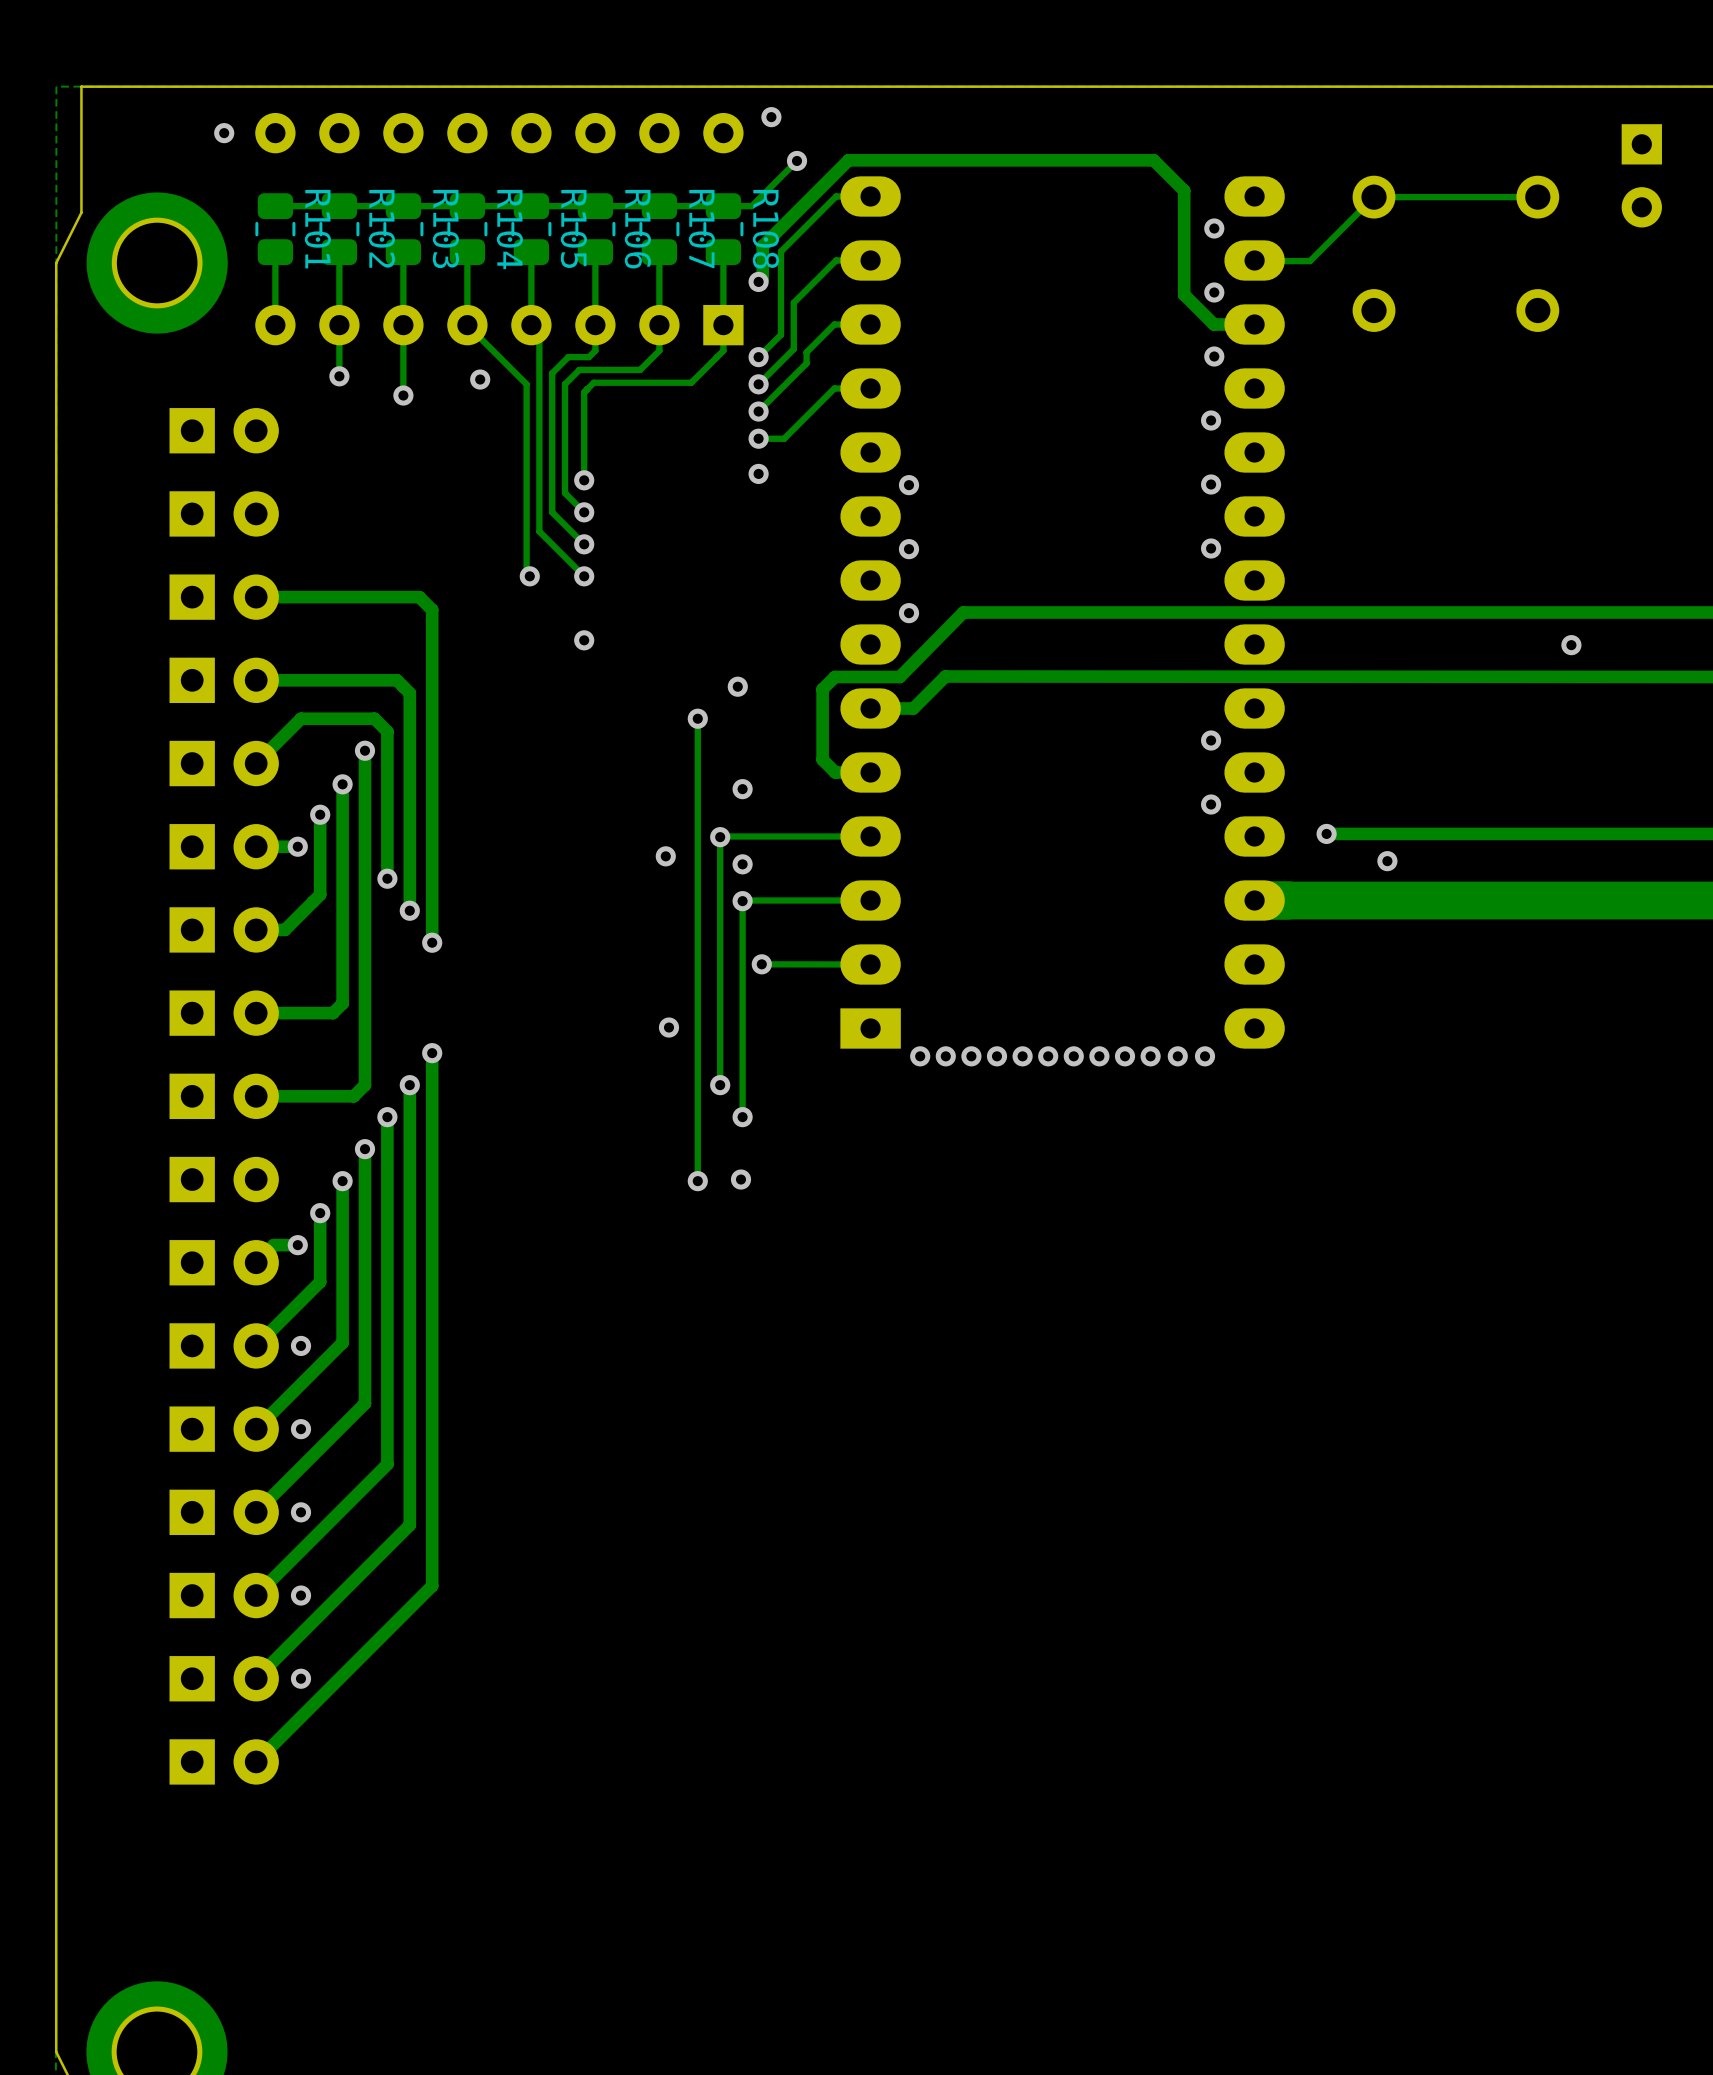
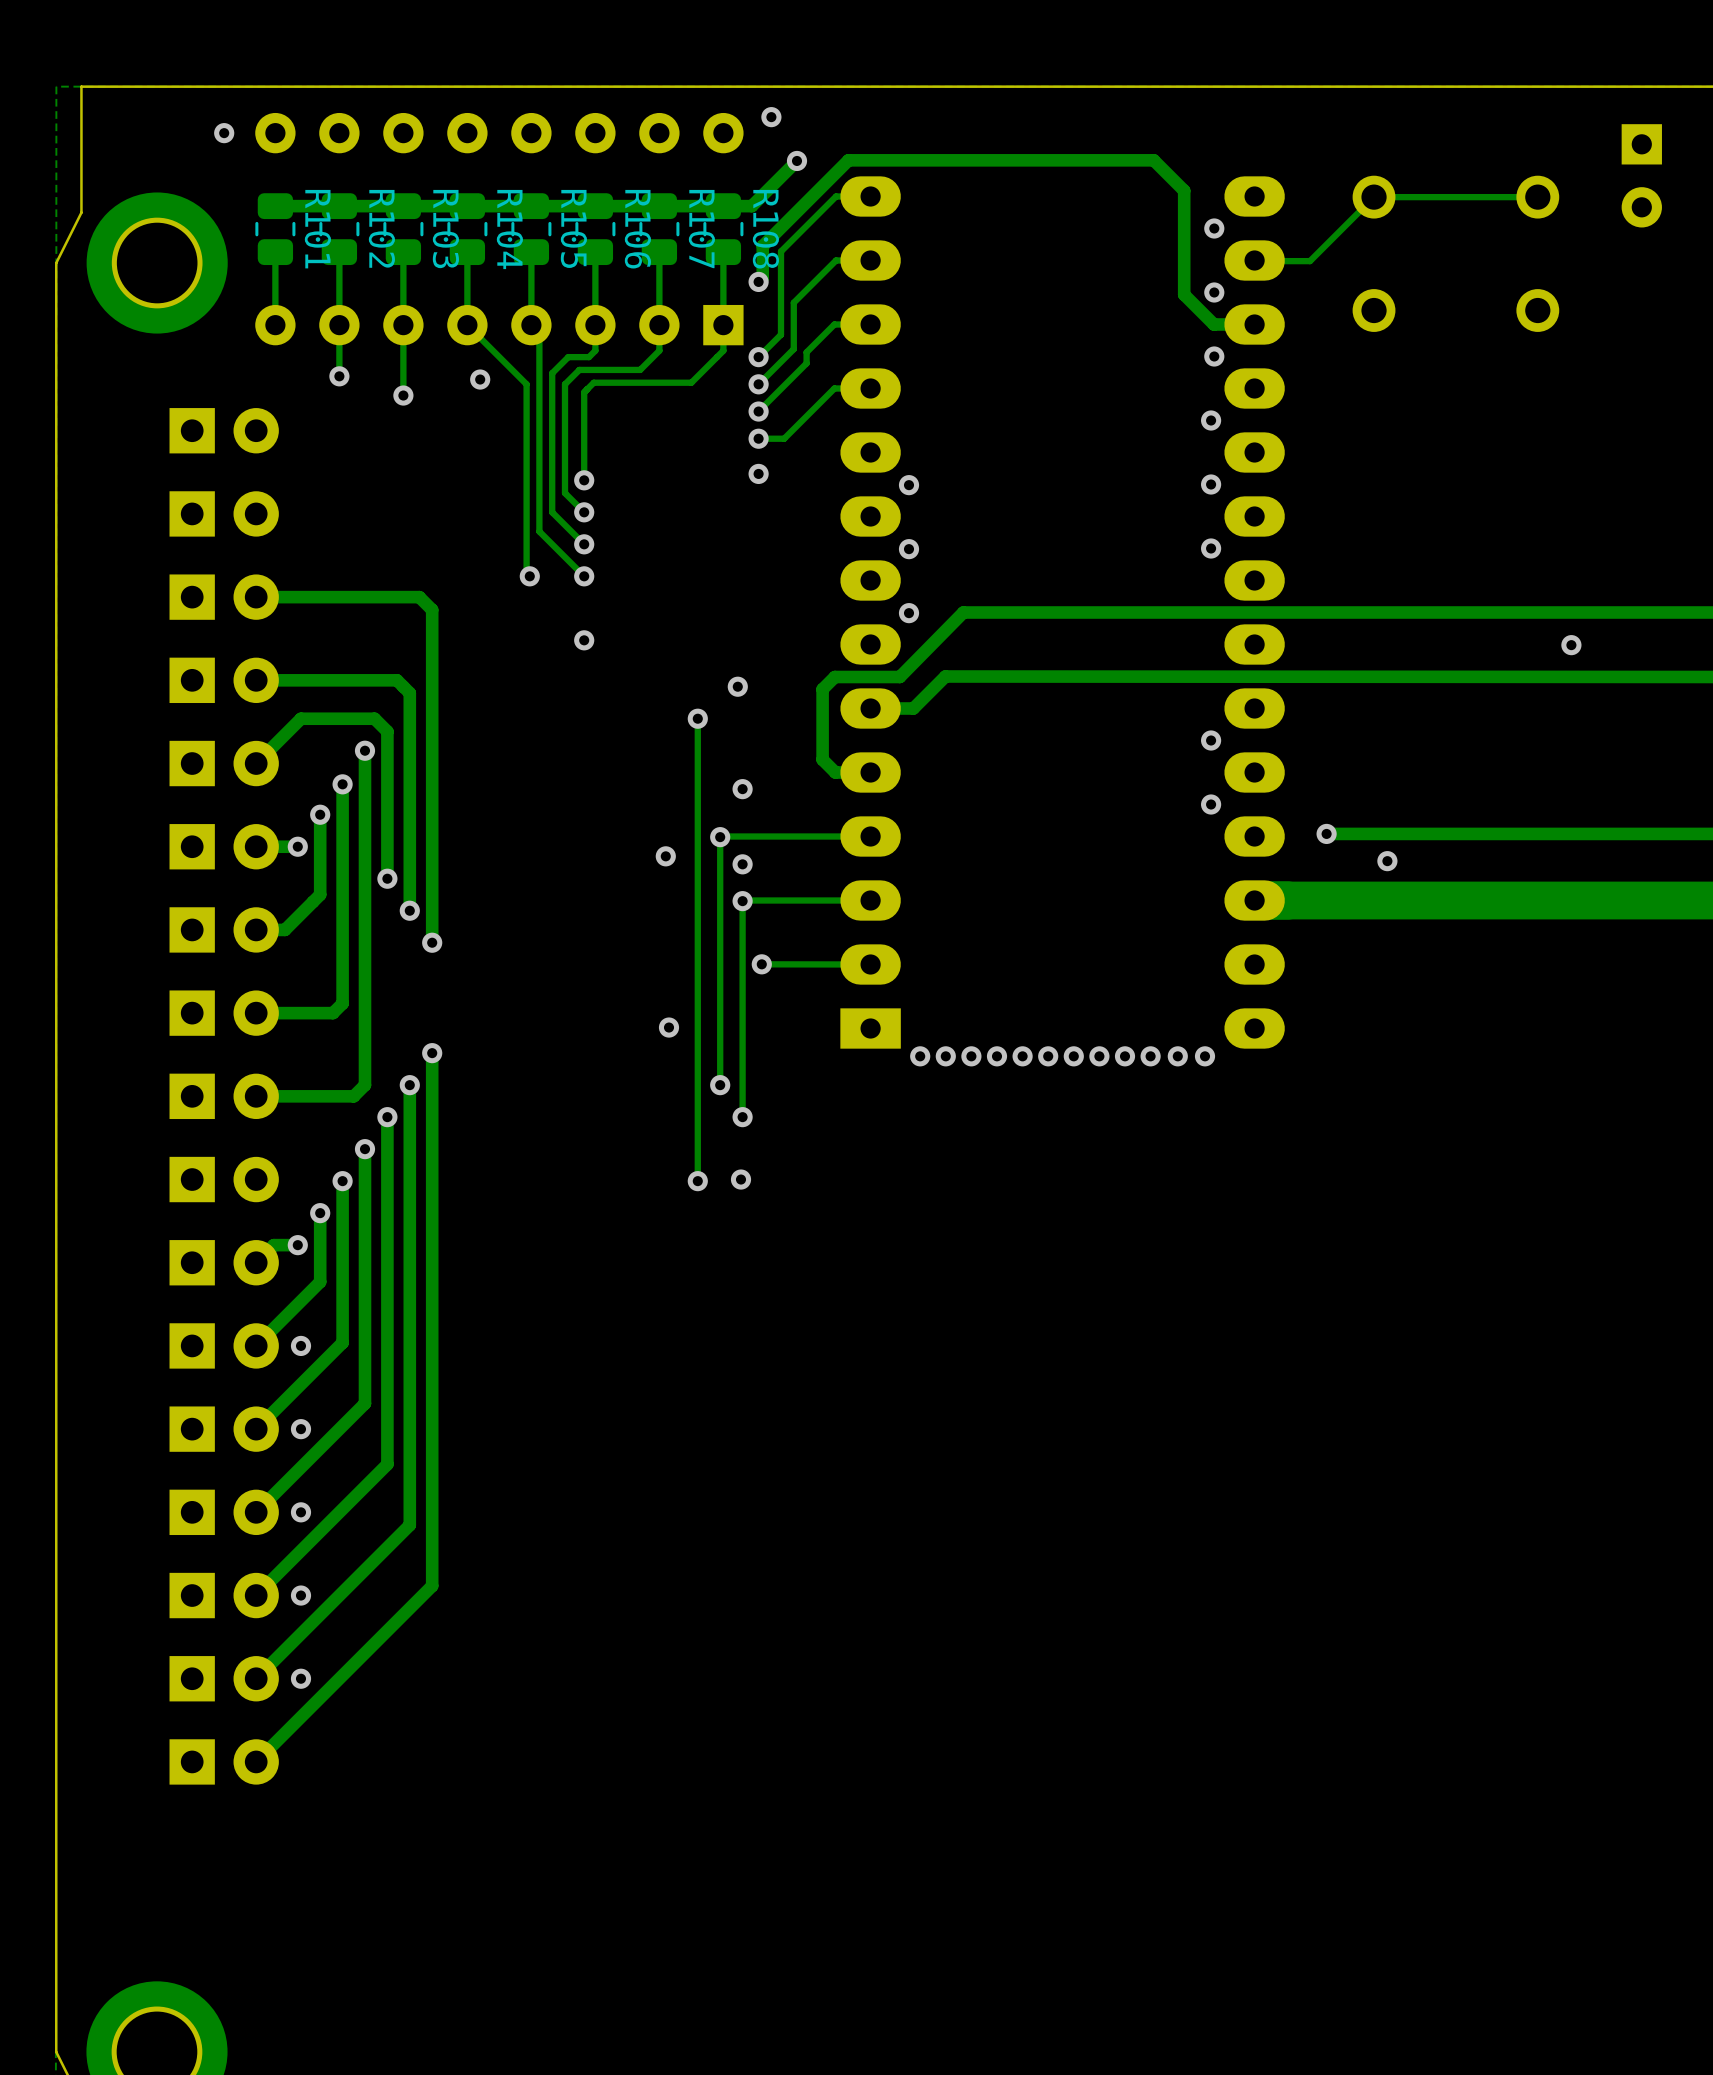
track width: thin (797, 160) (751, 206) (275, 206) -> thick (797, 160) (751, 206) (275, 206)

